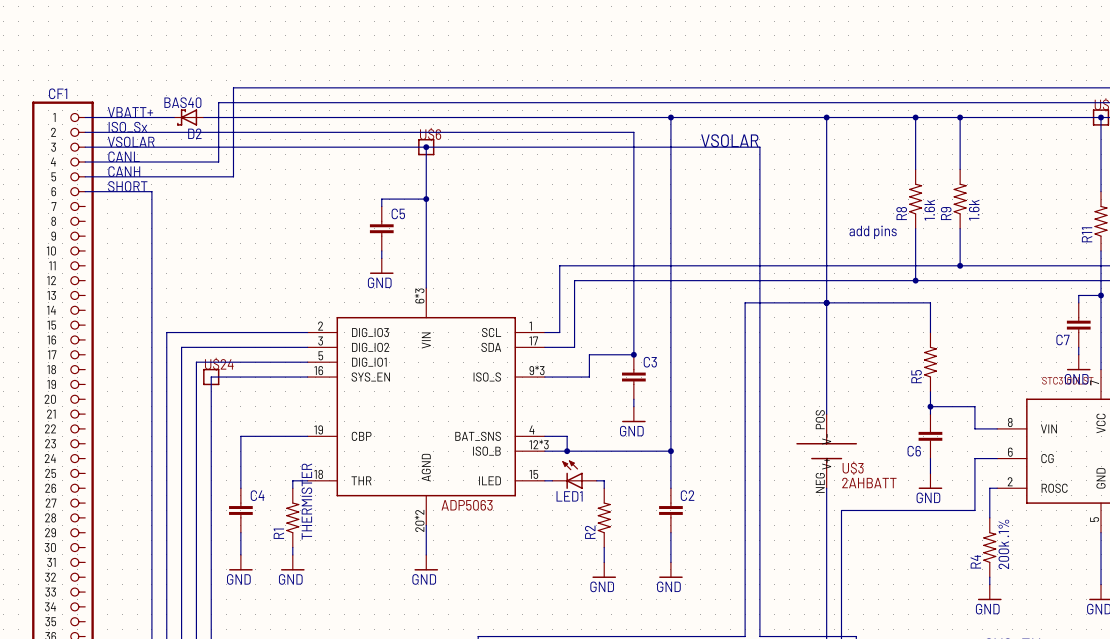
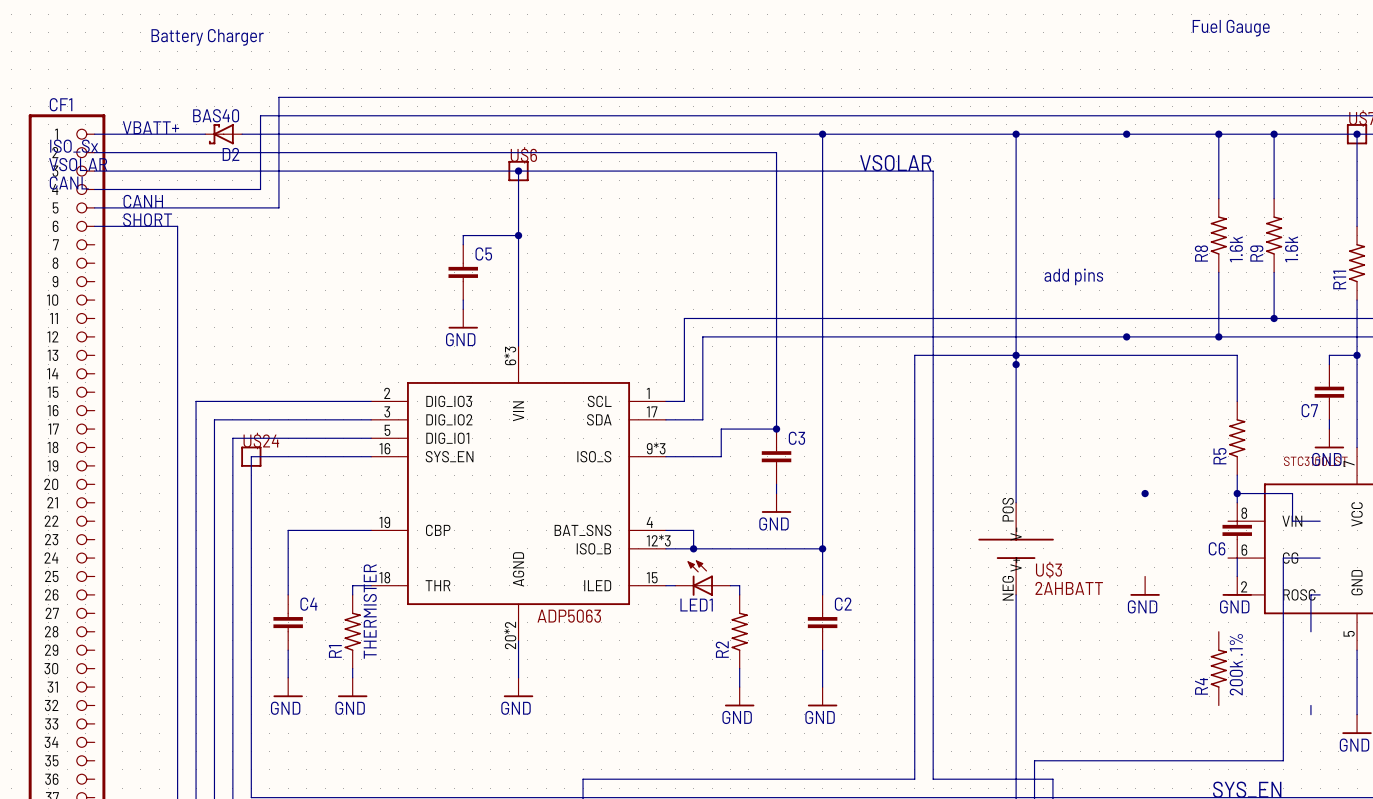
text: none -> Fuel Gauge (1231, 28)
text: none -> Battery Charger (207, 37)
wire: (915, 117) (915, 169) -> (1218, 134) (1218, 198)
wire: (960, 117) (960, 169) -> (1274, 134) (1274, 198)
junction position: (960, 117) -> (1218, 134)
junction: none -> (1274, 134)
text position: ISO_Sx (127, 127) -> ISO_Sx (74, 146)
text position: VSOLAR (131, 141) -> VSOLAR (78, 164)
text position: CANL (124, 156) -> CANL (69, 183)
R8 position: (915, 199) -> (1218, 235)
R9 position: (960, 199) -> (1274, 235)
wire: (915, 228) (915, 280) -> (1218, 272) (1218, 336)
wire: (960, 228) (960, 265) -> (1274, 272) (1274, 318)
junction position: (960, 265) -> (1218, 336)
junction: none -> (1274, 318)
junction: none -> (1016, 355)
wire: (745, 302) (930, 302) (930, 332) -> (914, 364) (914, 355) (1237, 355) (1237, 401)
R5 position: (930, 362) -> (1237, 438)
wire: (930, 391) (930, 414) -> (1237, 475) (1237, 502)
wire: (930, 406) (974, 406) (974, 428) (997, 428) -> (1237, 493) (1292, 493) (1292, 521) (1320, 521)
junction: none -> (1237, 493)
C6 position: (930, 436) -> (1237, 530)
wire: (930, 458) (930, 473) -> (1237, 558) (1237, 576)
wire: (997, 458) (974, 458) (974, 510) (841, 510) (841, 621) -> (1320, 558) (1283, 558) (1283, 760) (1034, 760)
wire: (997, 488) (989, 488) (989, 517) -> (1320, 594) (1310, 594) (1310, 631)
wire: (989, 577) (989, 584) -> (1310, 705) (1310, 714)
power symbol position: GND (989, 592) -> GND (1237, 586)

